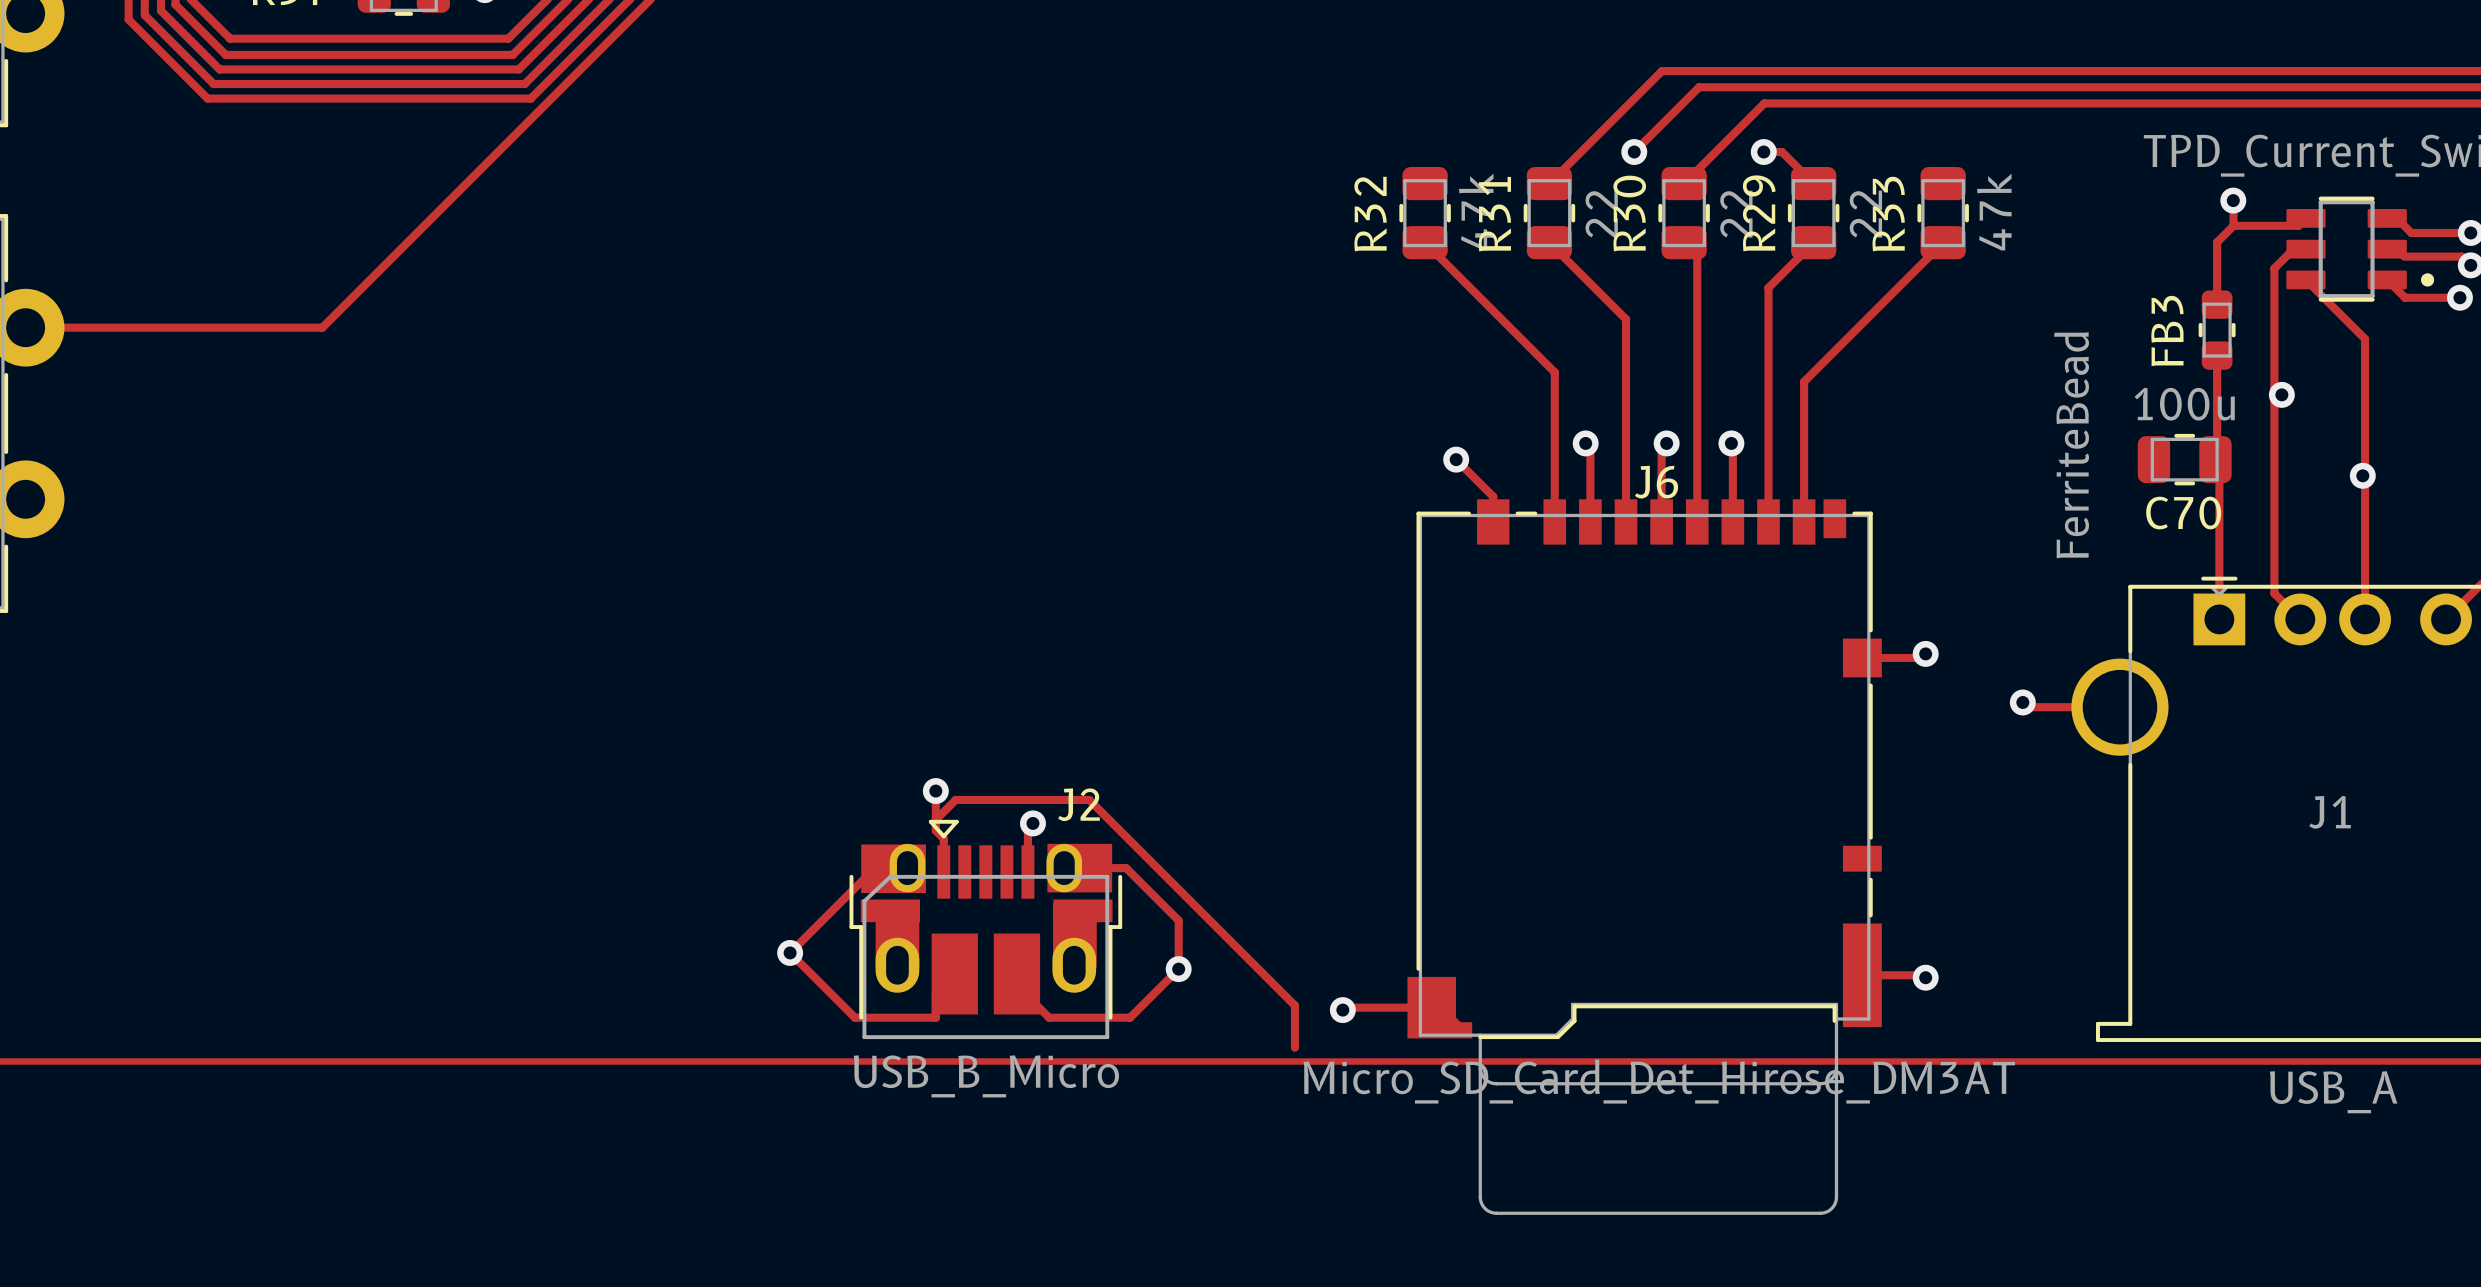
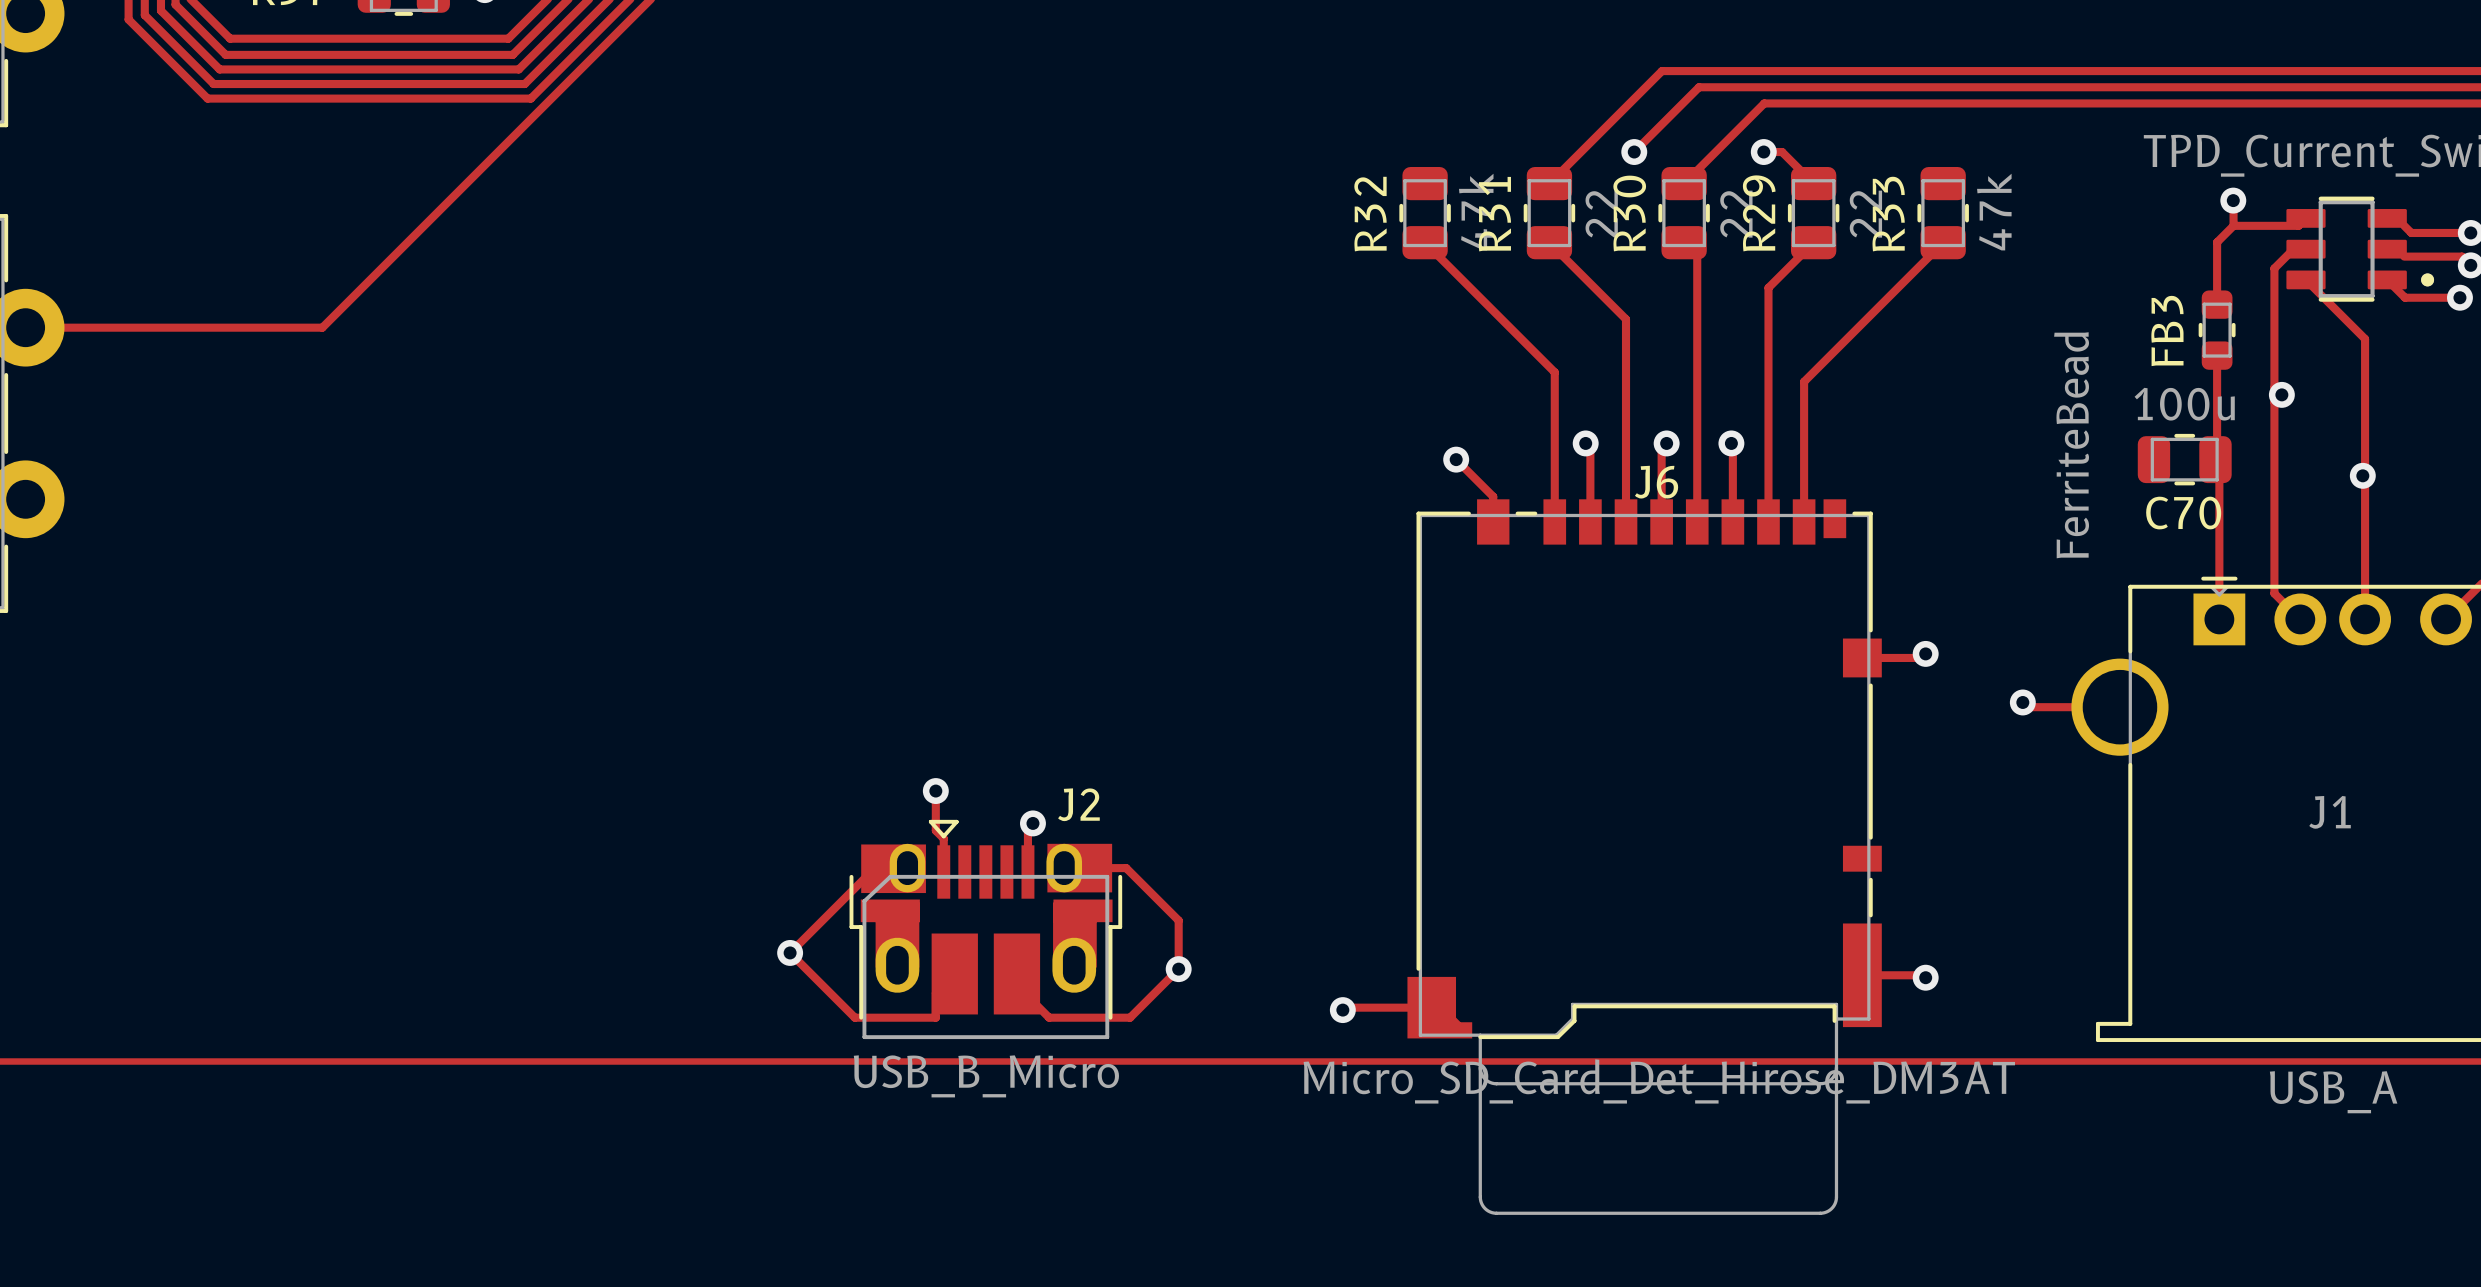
track: (935, 819) (955, 799) (1089, 799) (1294, 1005) (1294, 1047) -> none

